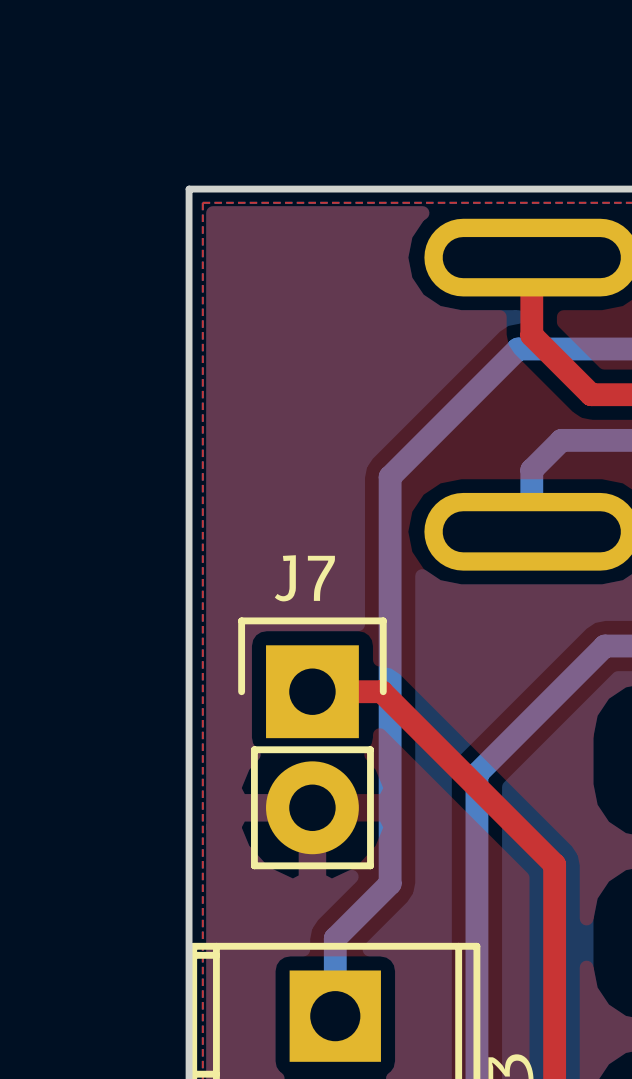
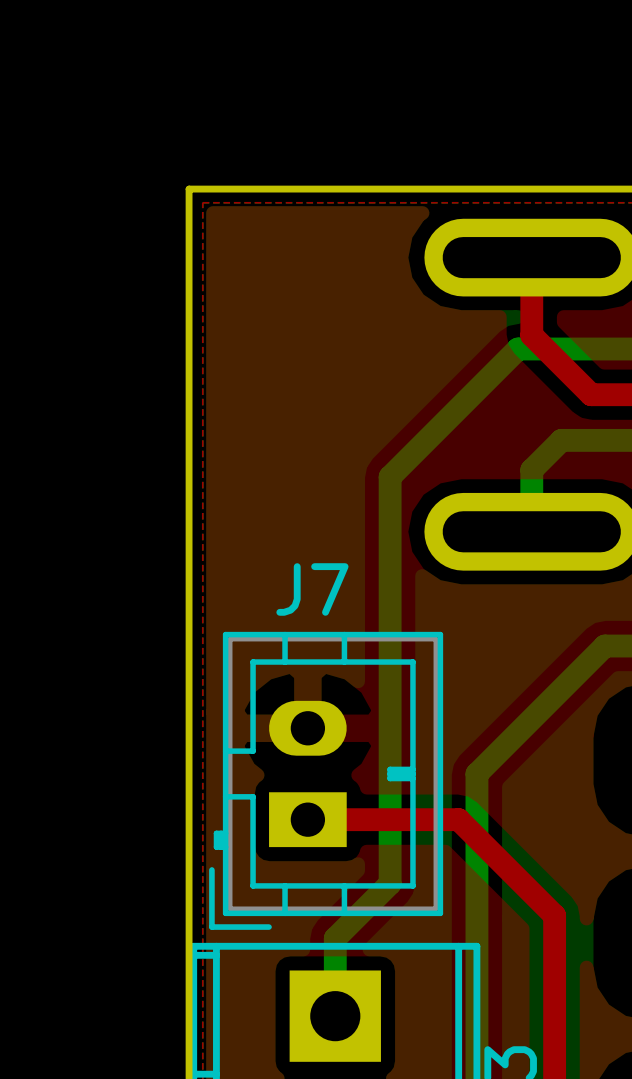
J7 footprint: [238, 617, 387, 870] -> [209, 631, 444, 930]
top track: (312, 691) (381, 691) (554, 864) (554, 915) -> (307, 819) (458, 819) (554, 915)

